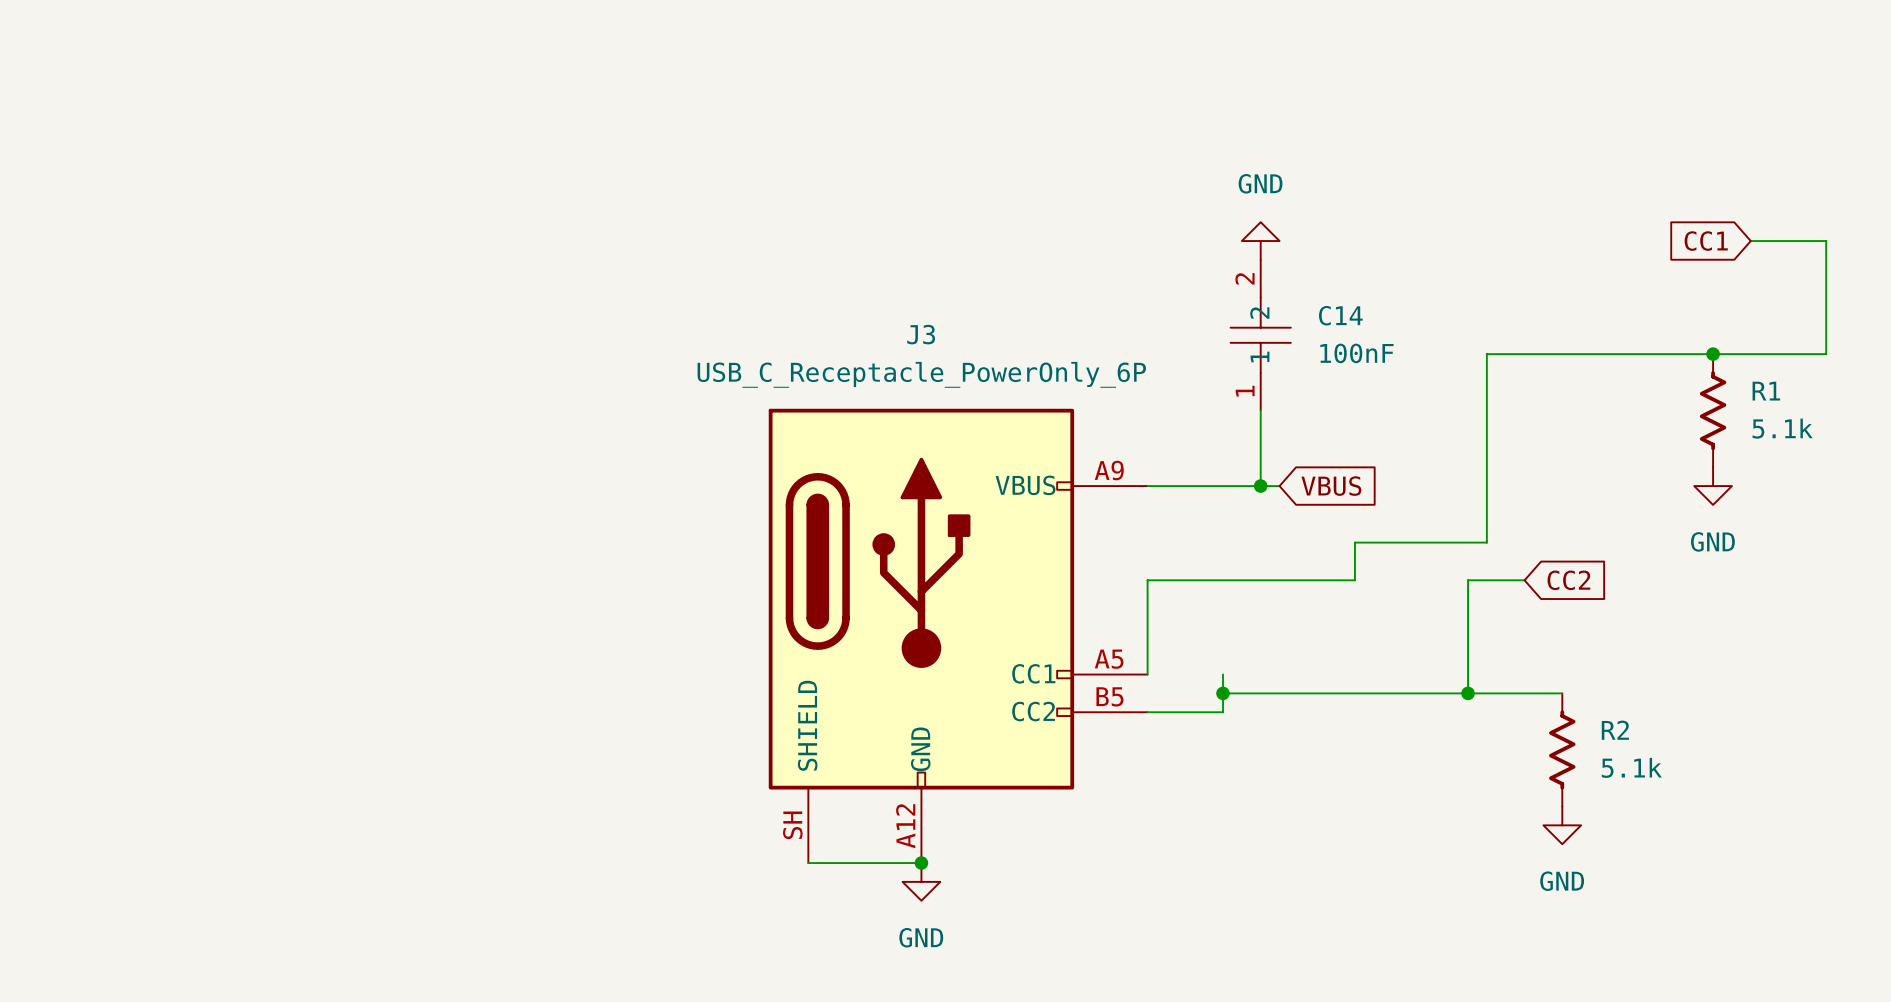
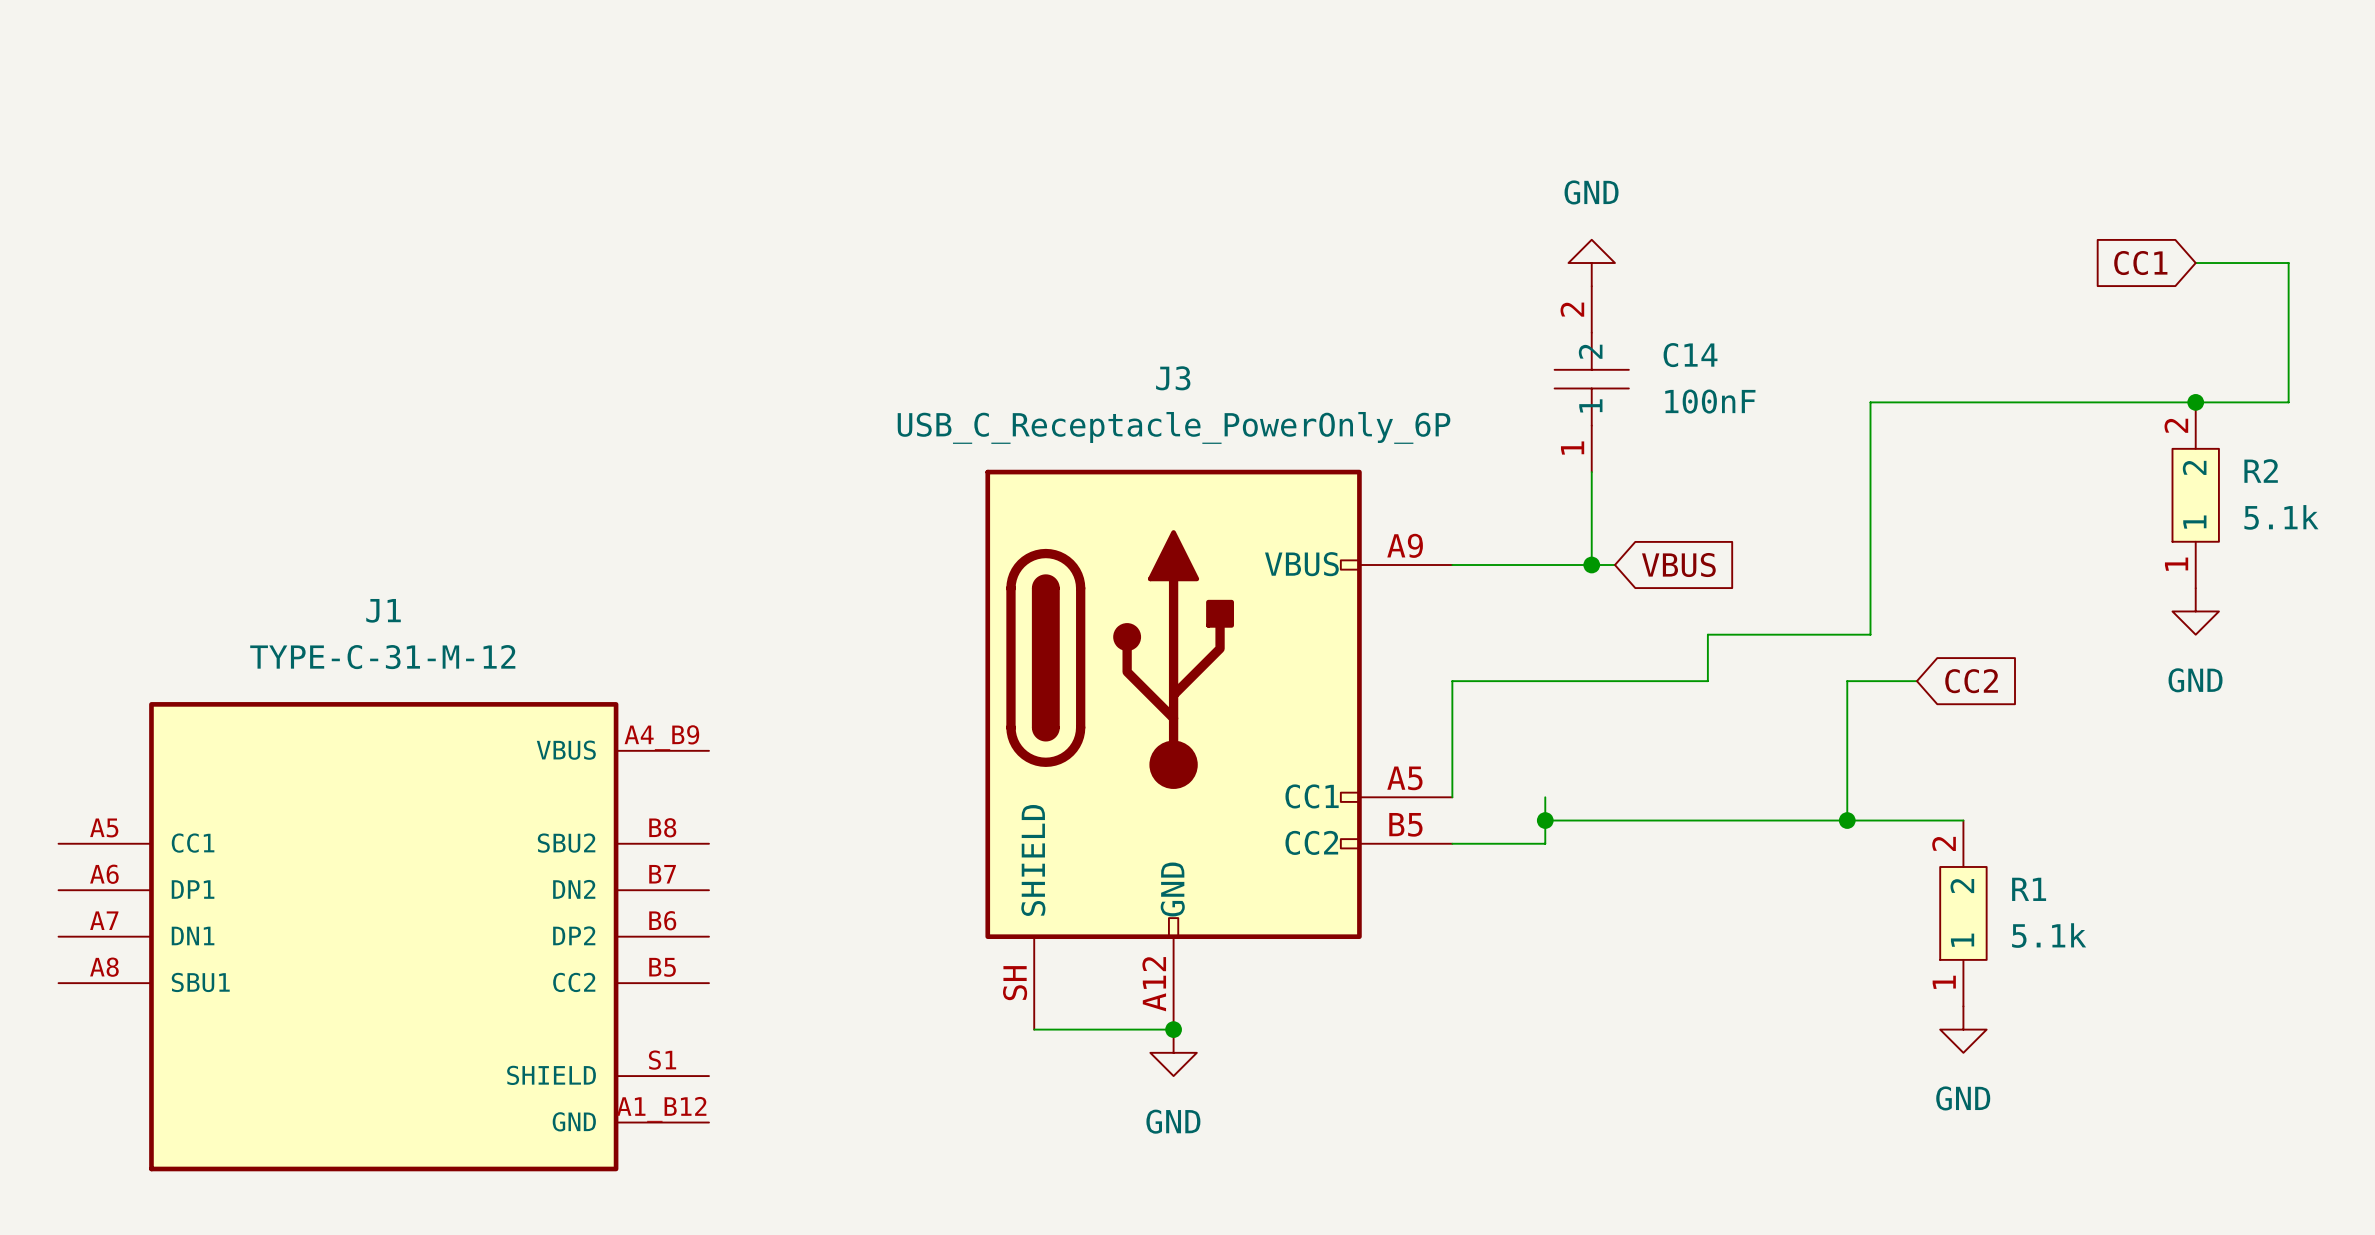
R1 symbol: [1699, 354, 1727, 468] -> [1940, 820, 1987, 1007]
junction position: (1713, 354) -> (2195, 402)
power symbol position: GND (1713, 486) -> GND (2195, 611)
R2 symbol: [1549, 693, 1576, 807] -> [2172, 402, 2219, 589]
J1: none -> TYPE-C-31-M-12 (383, 936)
power symbol position: GND (1562, 825) -> GND (1963, 1029)

